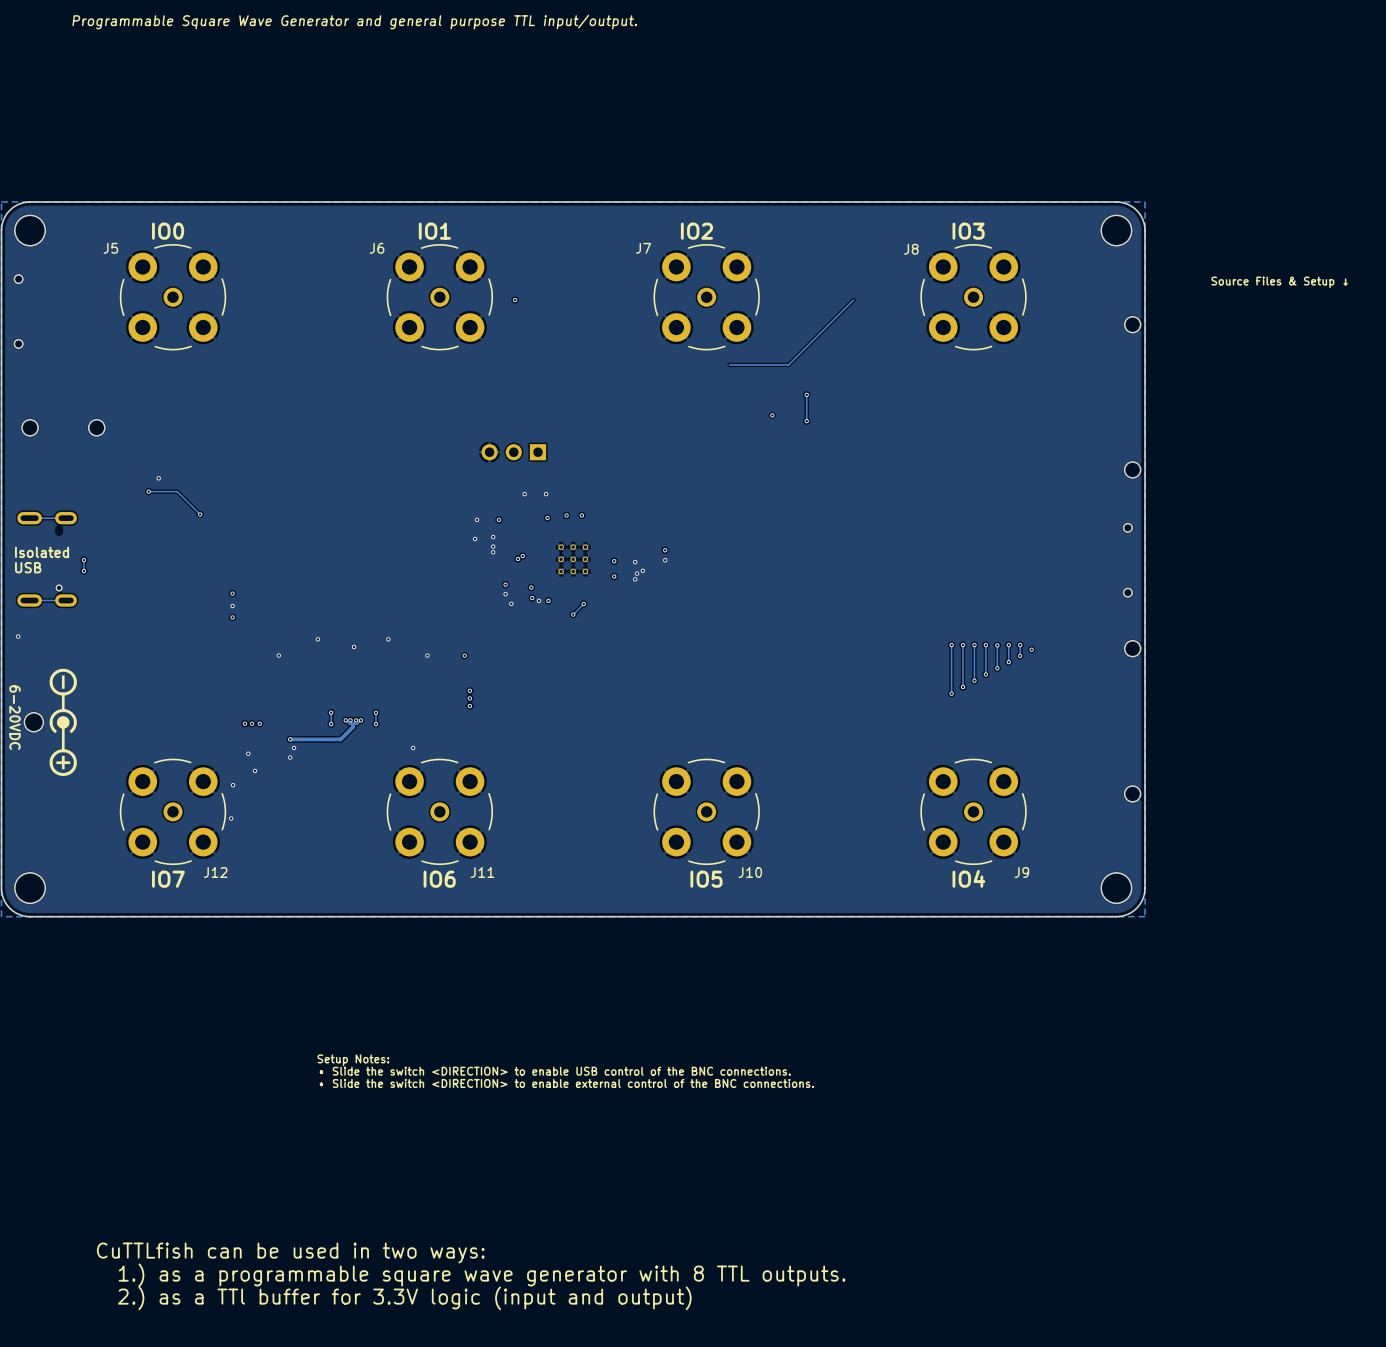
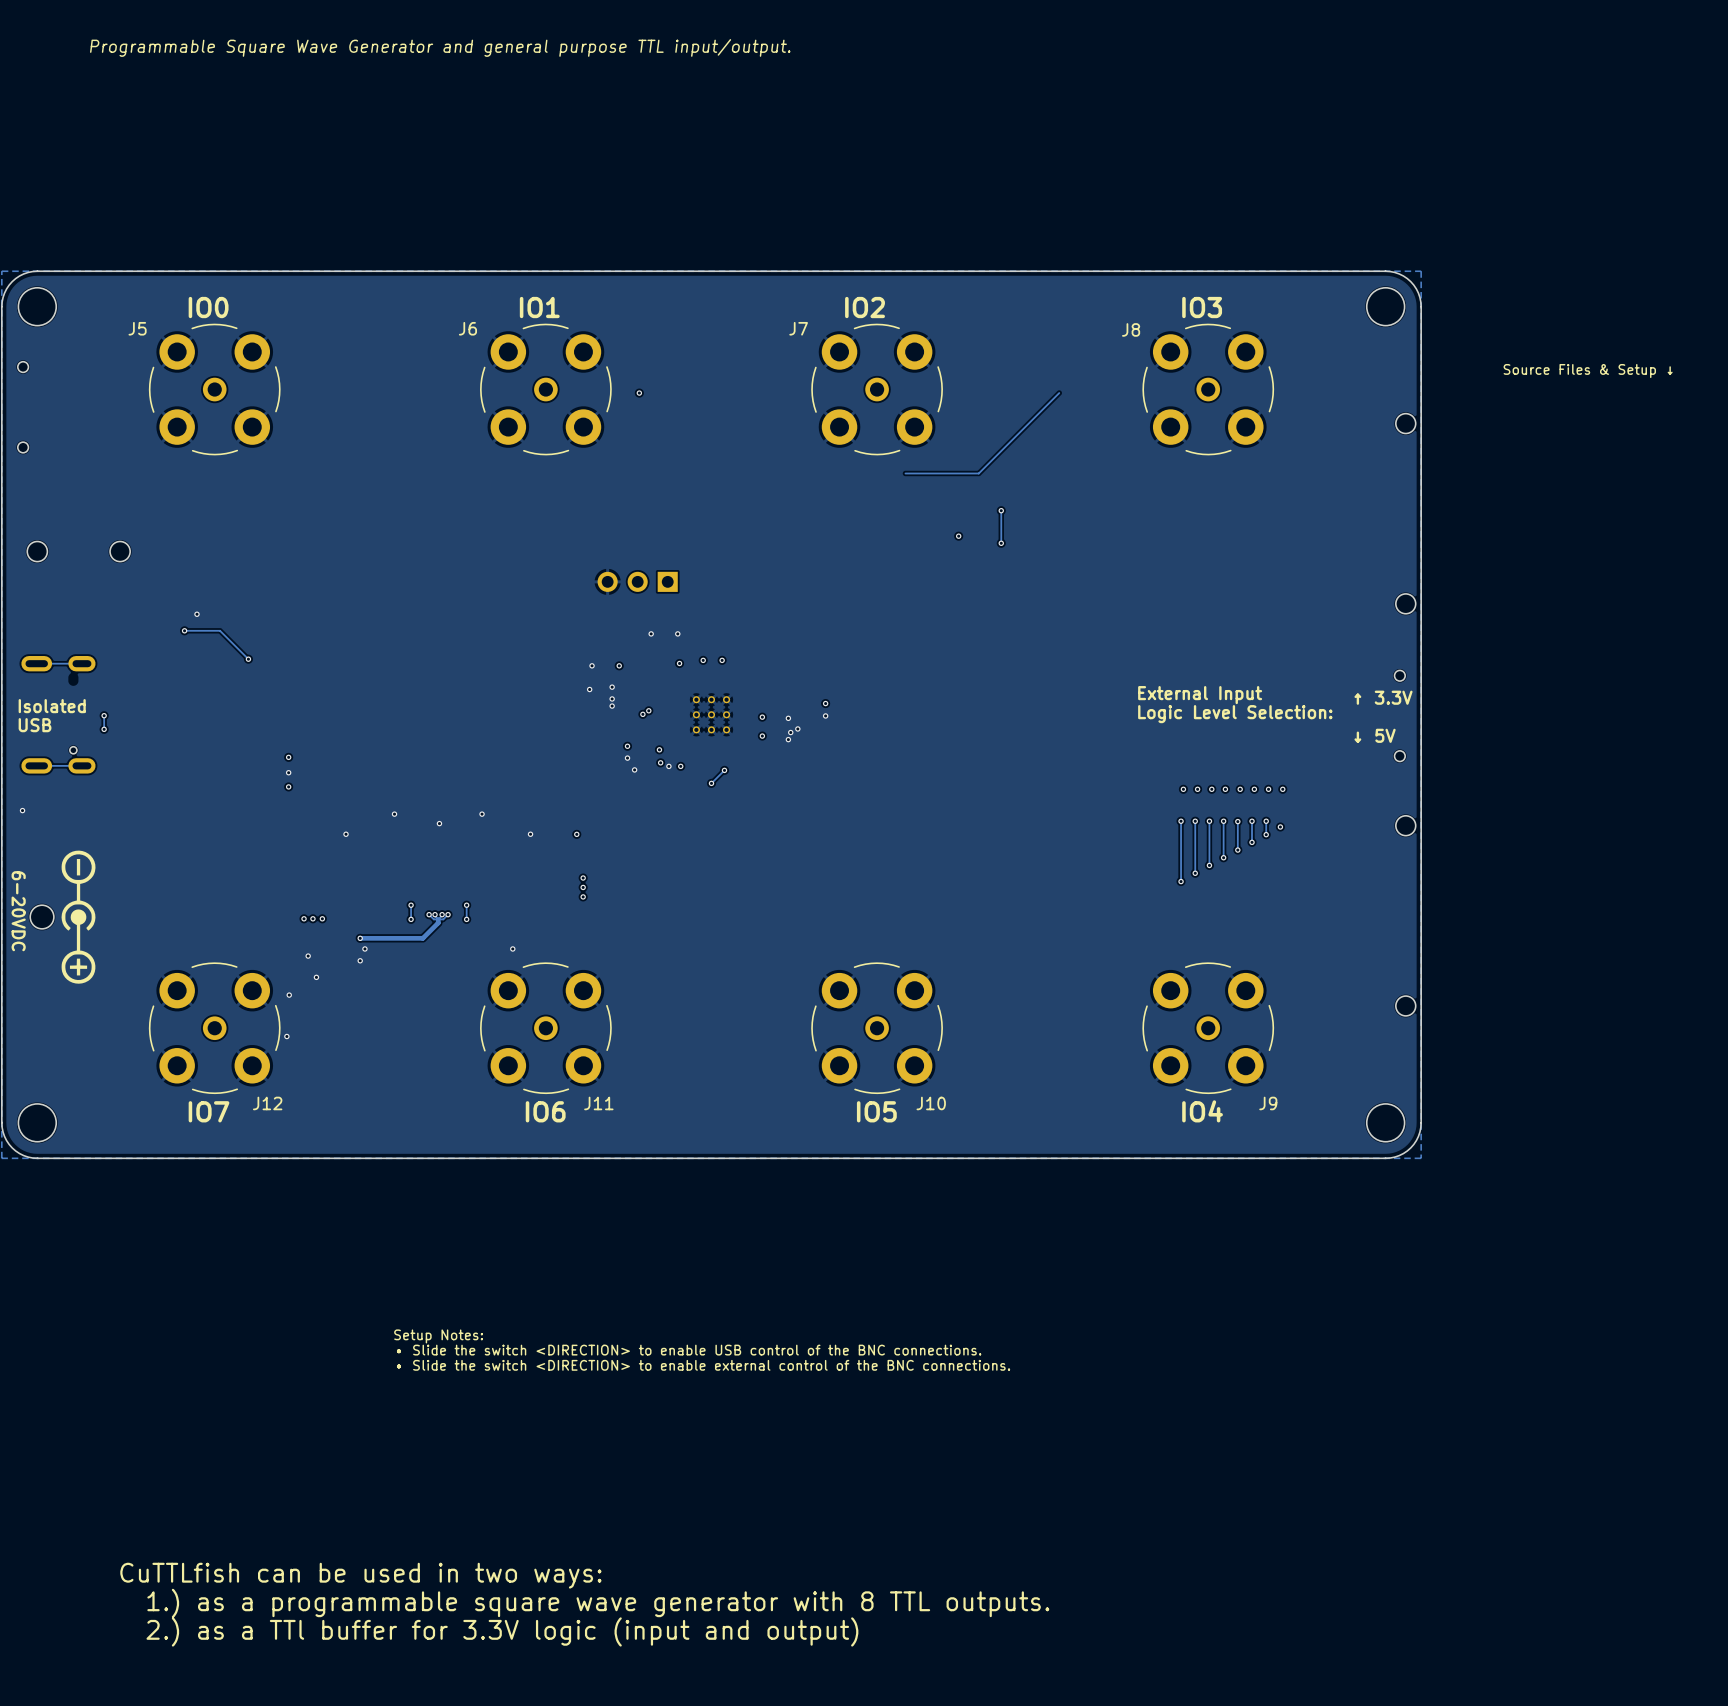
text: none -> External Input (1200, 695)
text: none -> ↑ 3.3V (1383, 697)
text: none -> Logic Level Selection: (1235, 714)
text: none -> ↓ 5V (1375, 735)
via: none -> (1183, 789)
via: none -> (1197, 789)
via: none -> (1211, 789)
via: none -> (1225, 789)
via: none -> (1240, 789)
via: none -> (1254, 789)
via: none -> (1268, 789)
via: none -> (1282, 789)

